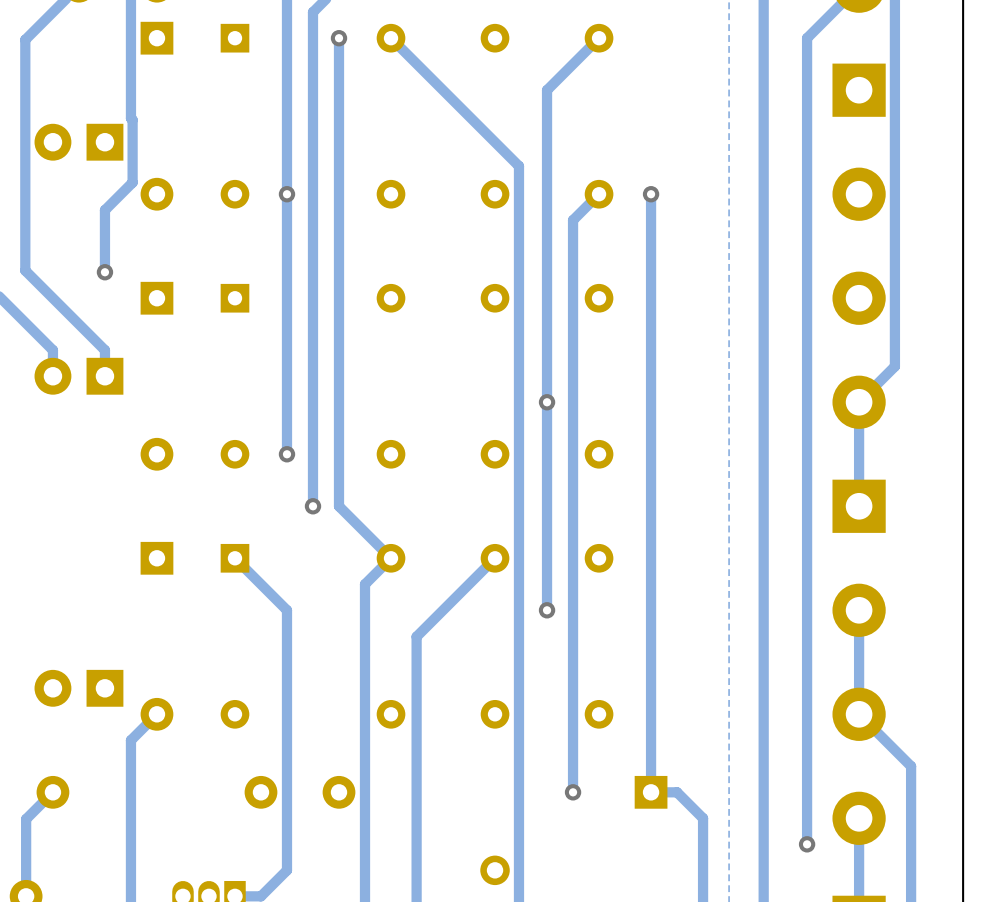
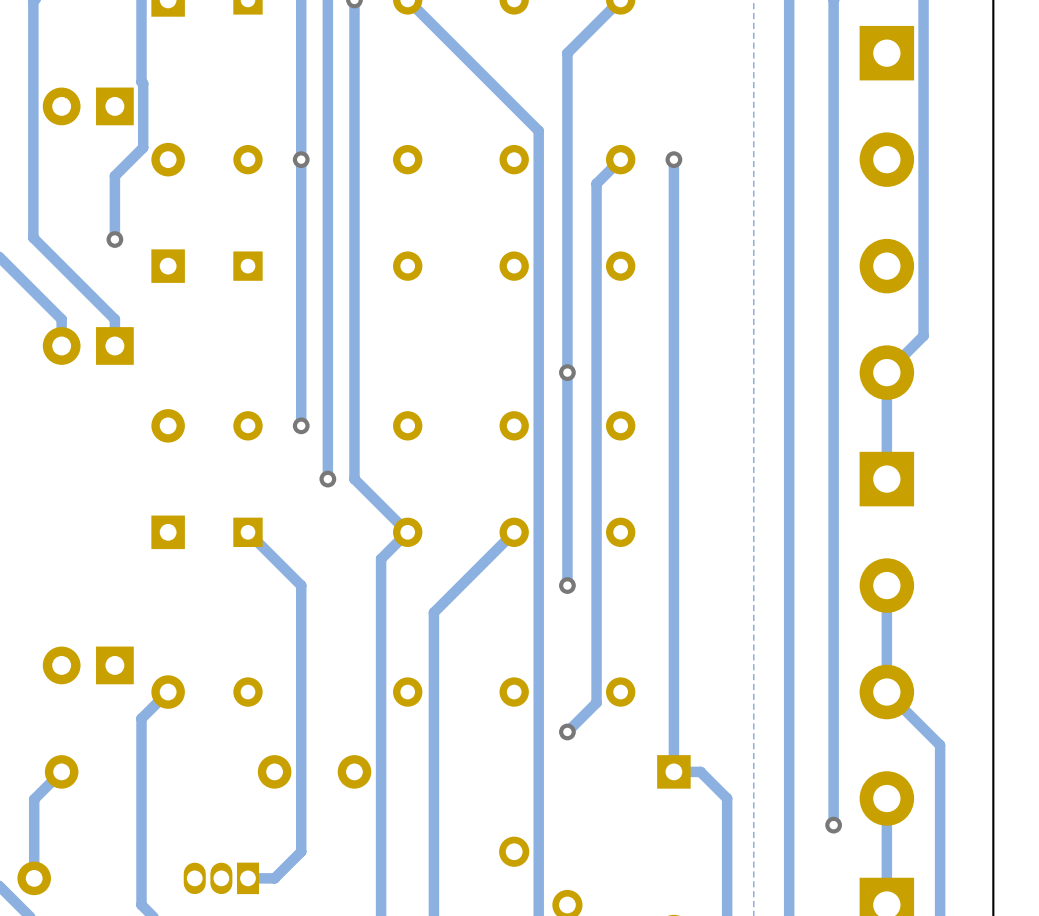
track: (575, 217) (573, 220) (573, 792) -> (596, 183) (596, 702) (567, 731)
via position: (573, 792) -> (567, 731)

